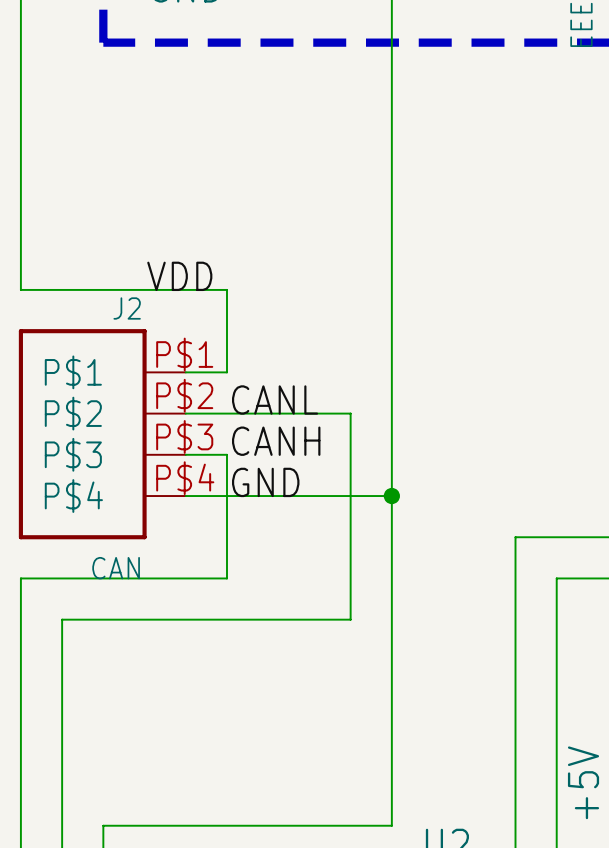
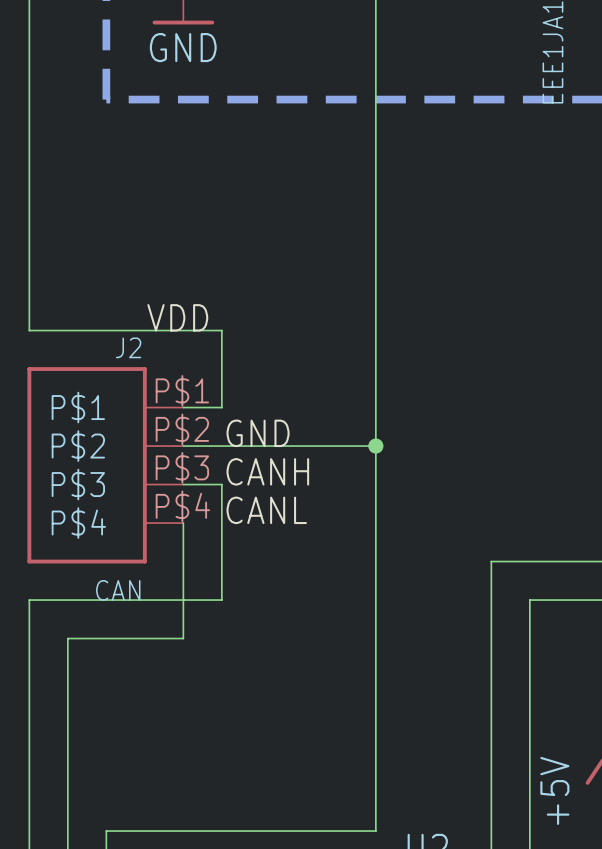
label: CANL (275, 399) -> GND (258, 433)
wire: (350, 413) (350, 619) (185, 619) -> (183, 523) (183, 638)
wire: none -> (337, 446) (375, 446)
label: GND (265, 482) -> CANL (266, 510)
wire: (185, 496) (391, 496) -> none
junction position: (391, 496) -> (375, 446)

